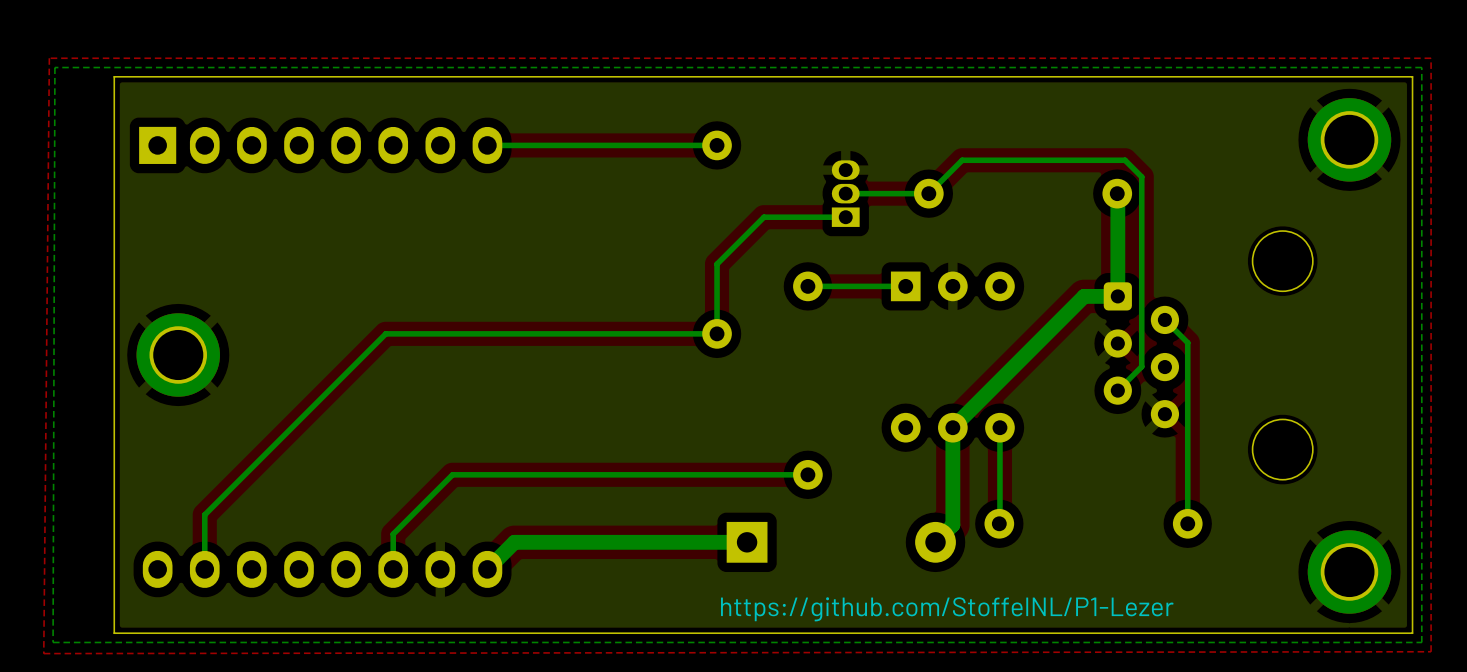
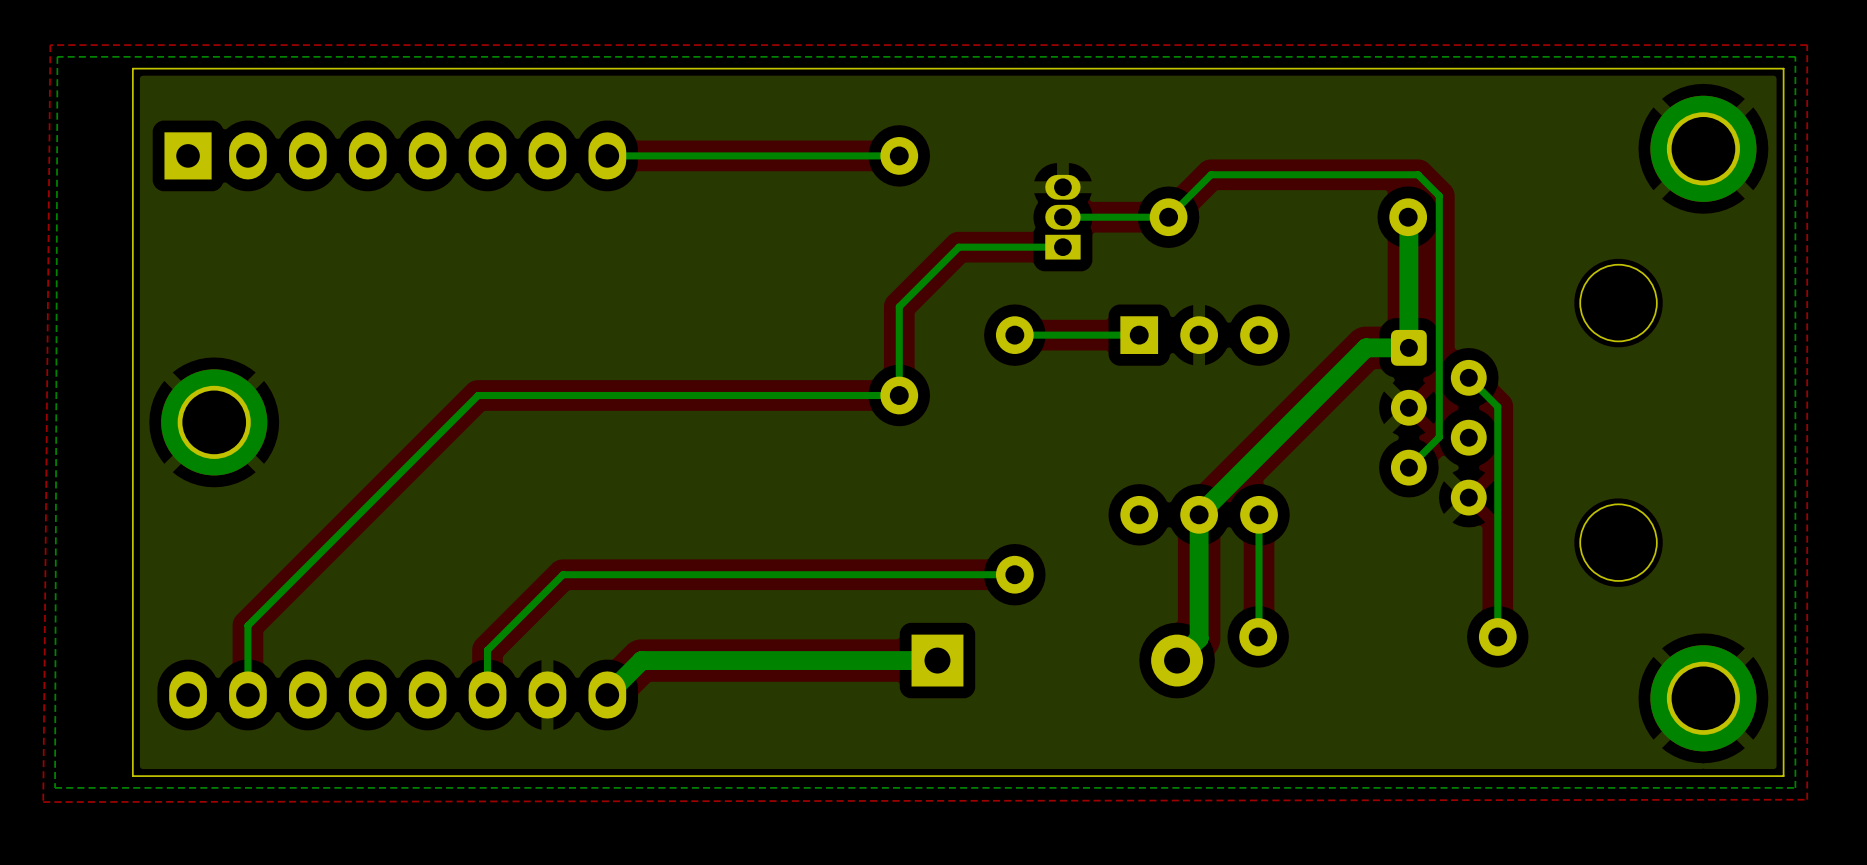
text: https://github.com/StoffelNL/P1-Lezer (947, 609) -> none

